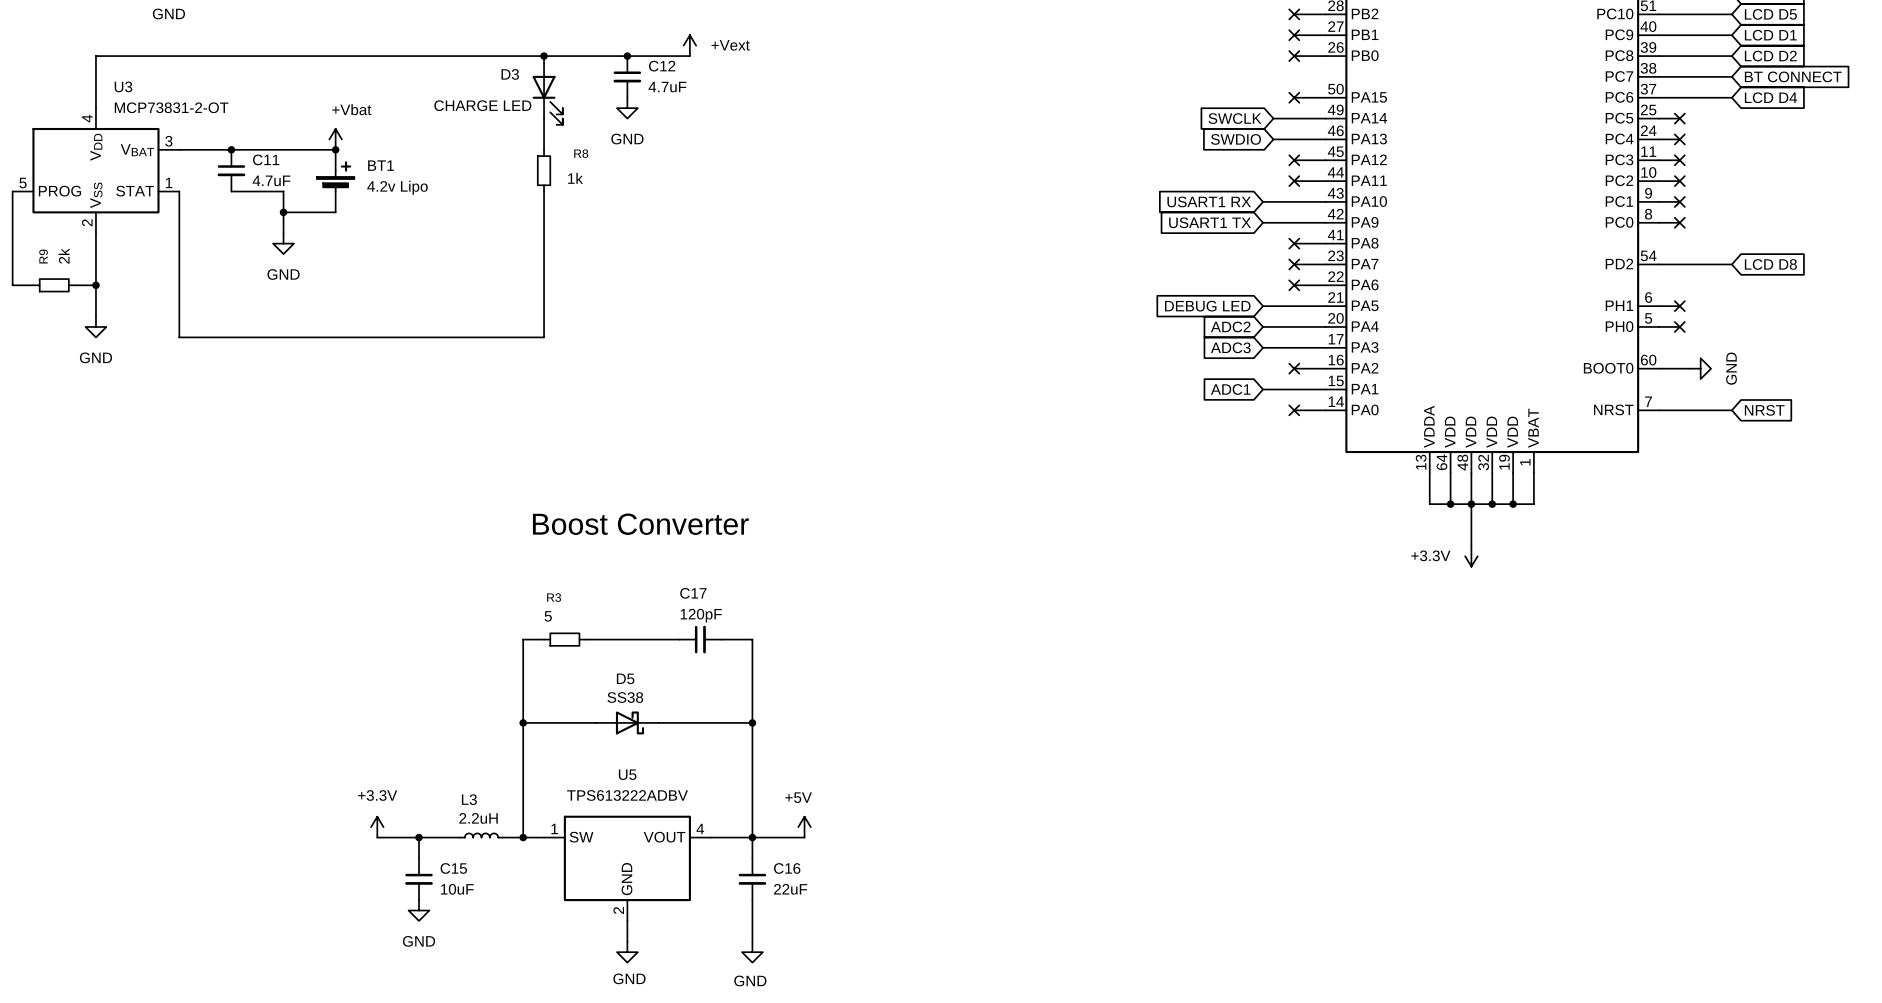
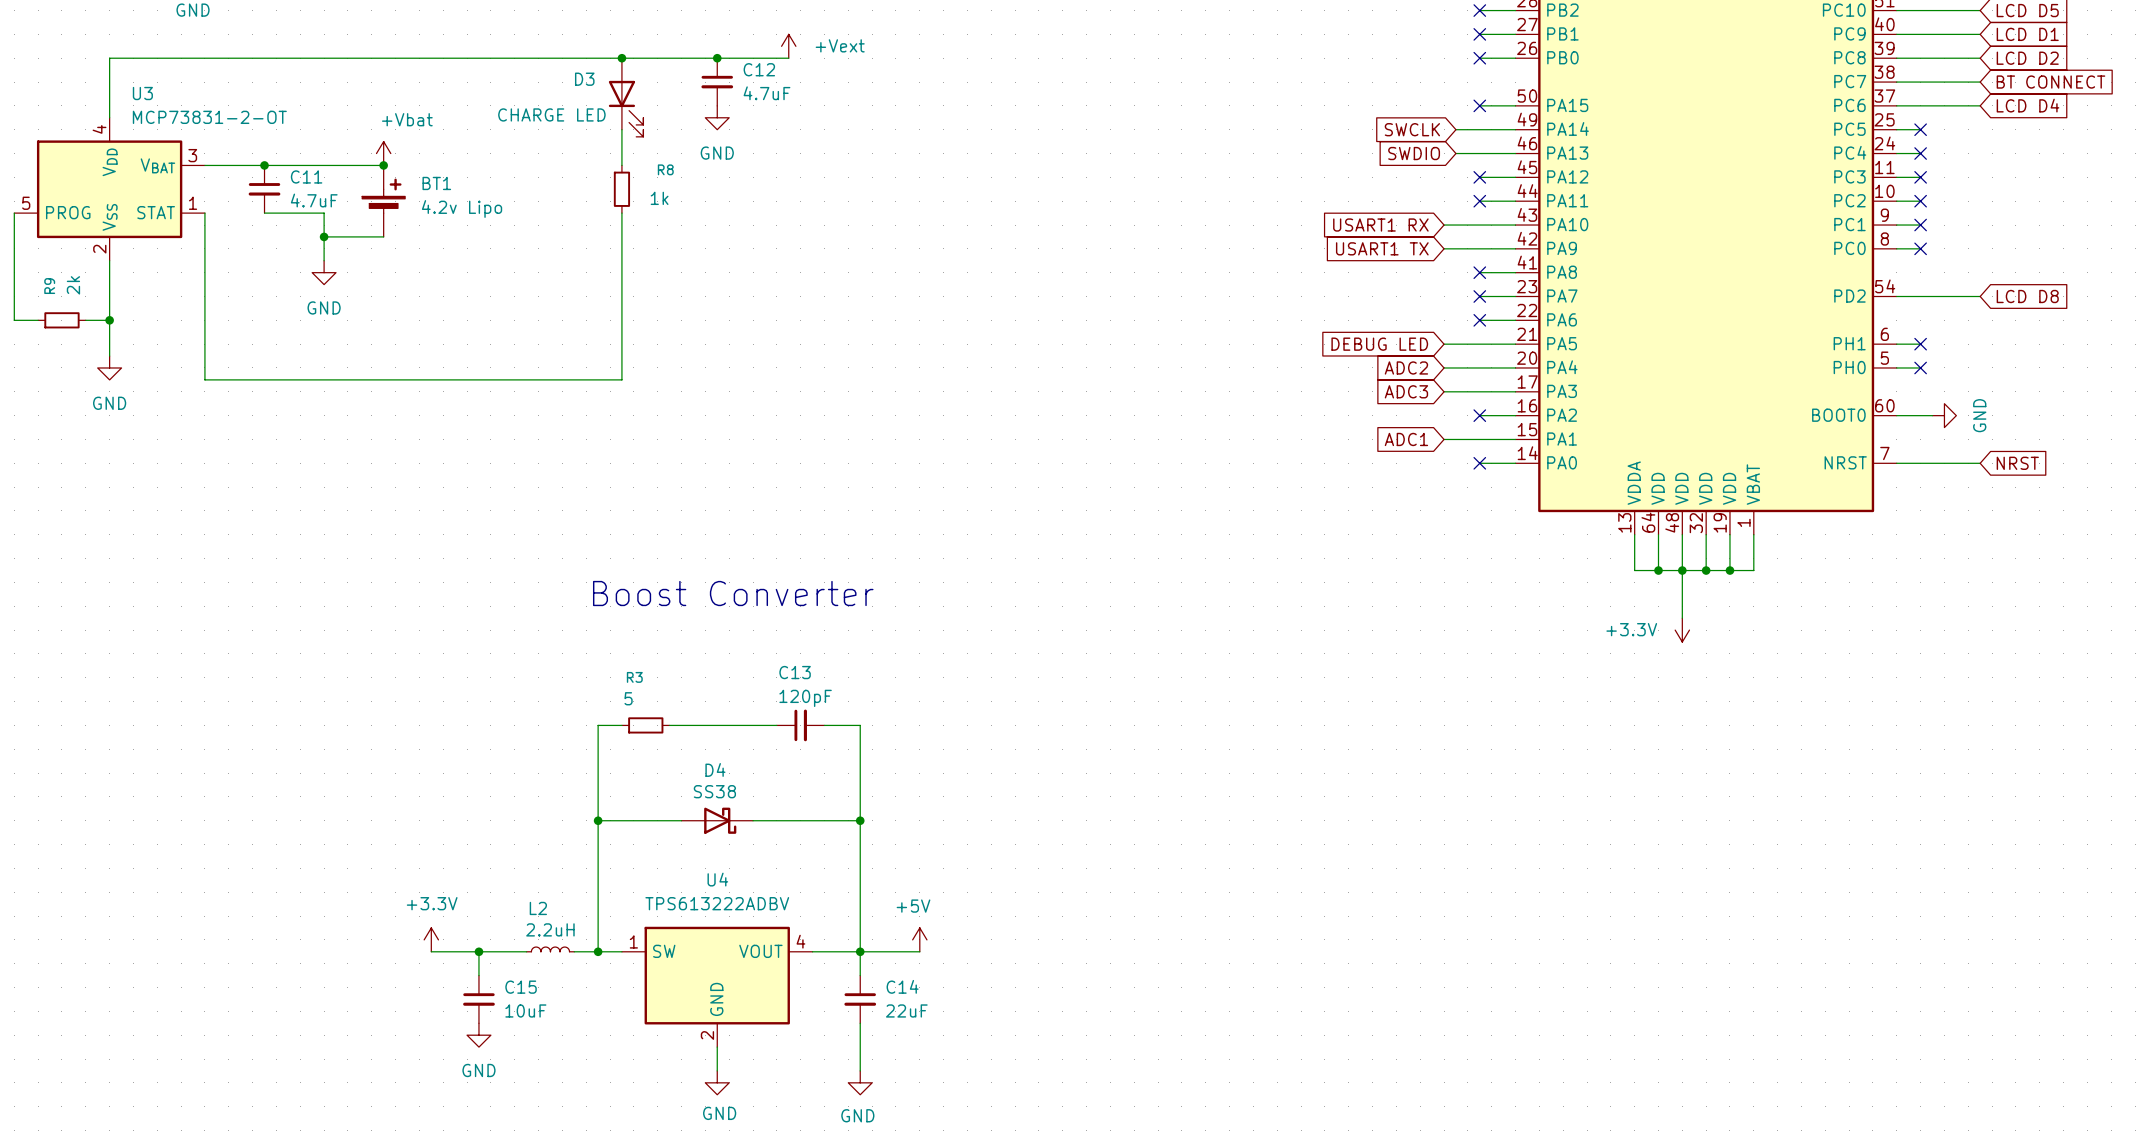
C17 name: C17 (693, 593) -> C13 (795, 672)
D5 name: D5 (625, 678) -> D4 (715, 769)
U5 name: U5 (627, 774) -> U4 (717, 879)
L3 name: L3 (469, 799) -> L2 (538, 908)
C16 name: C16 (787, 868) -> C14 (902, 986)

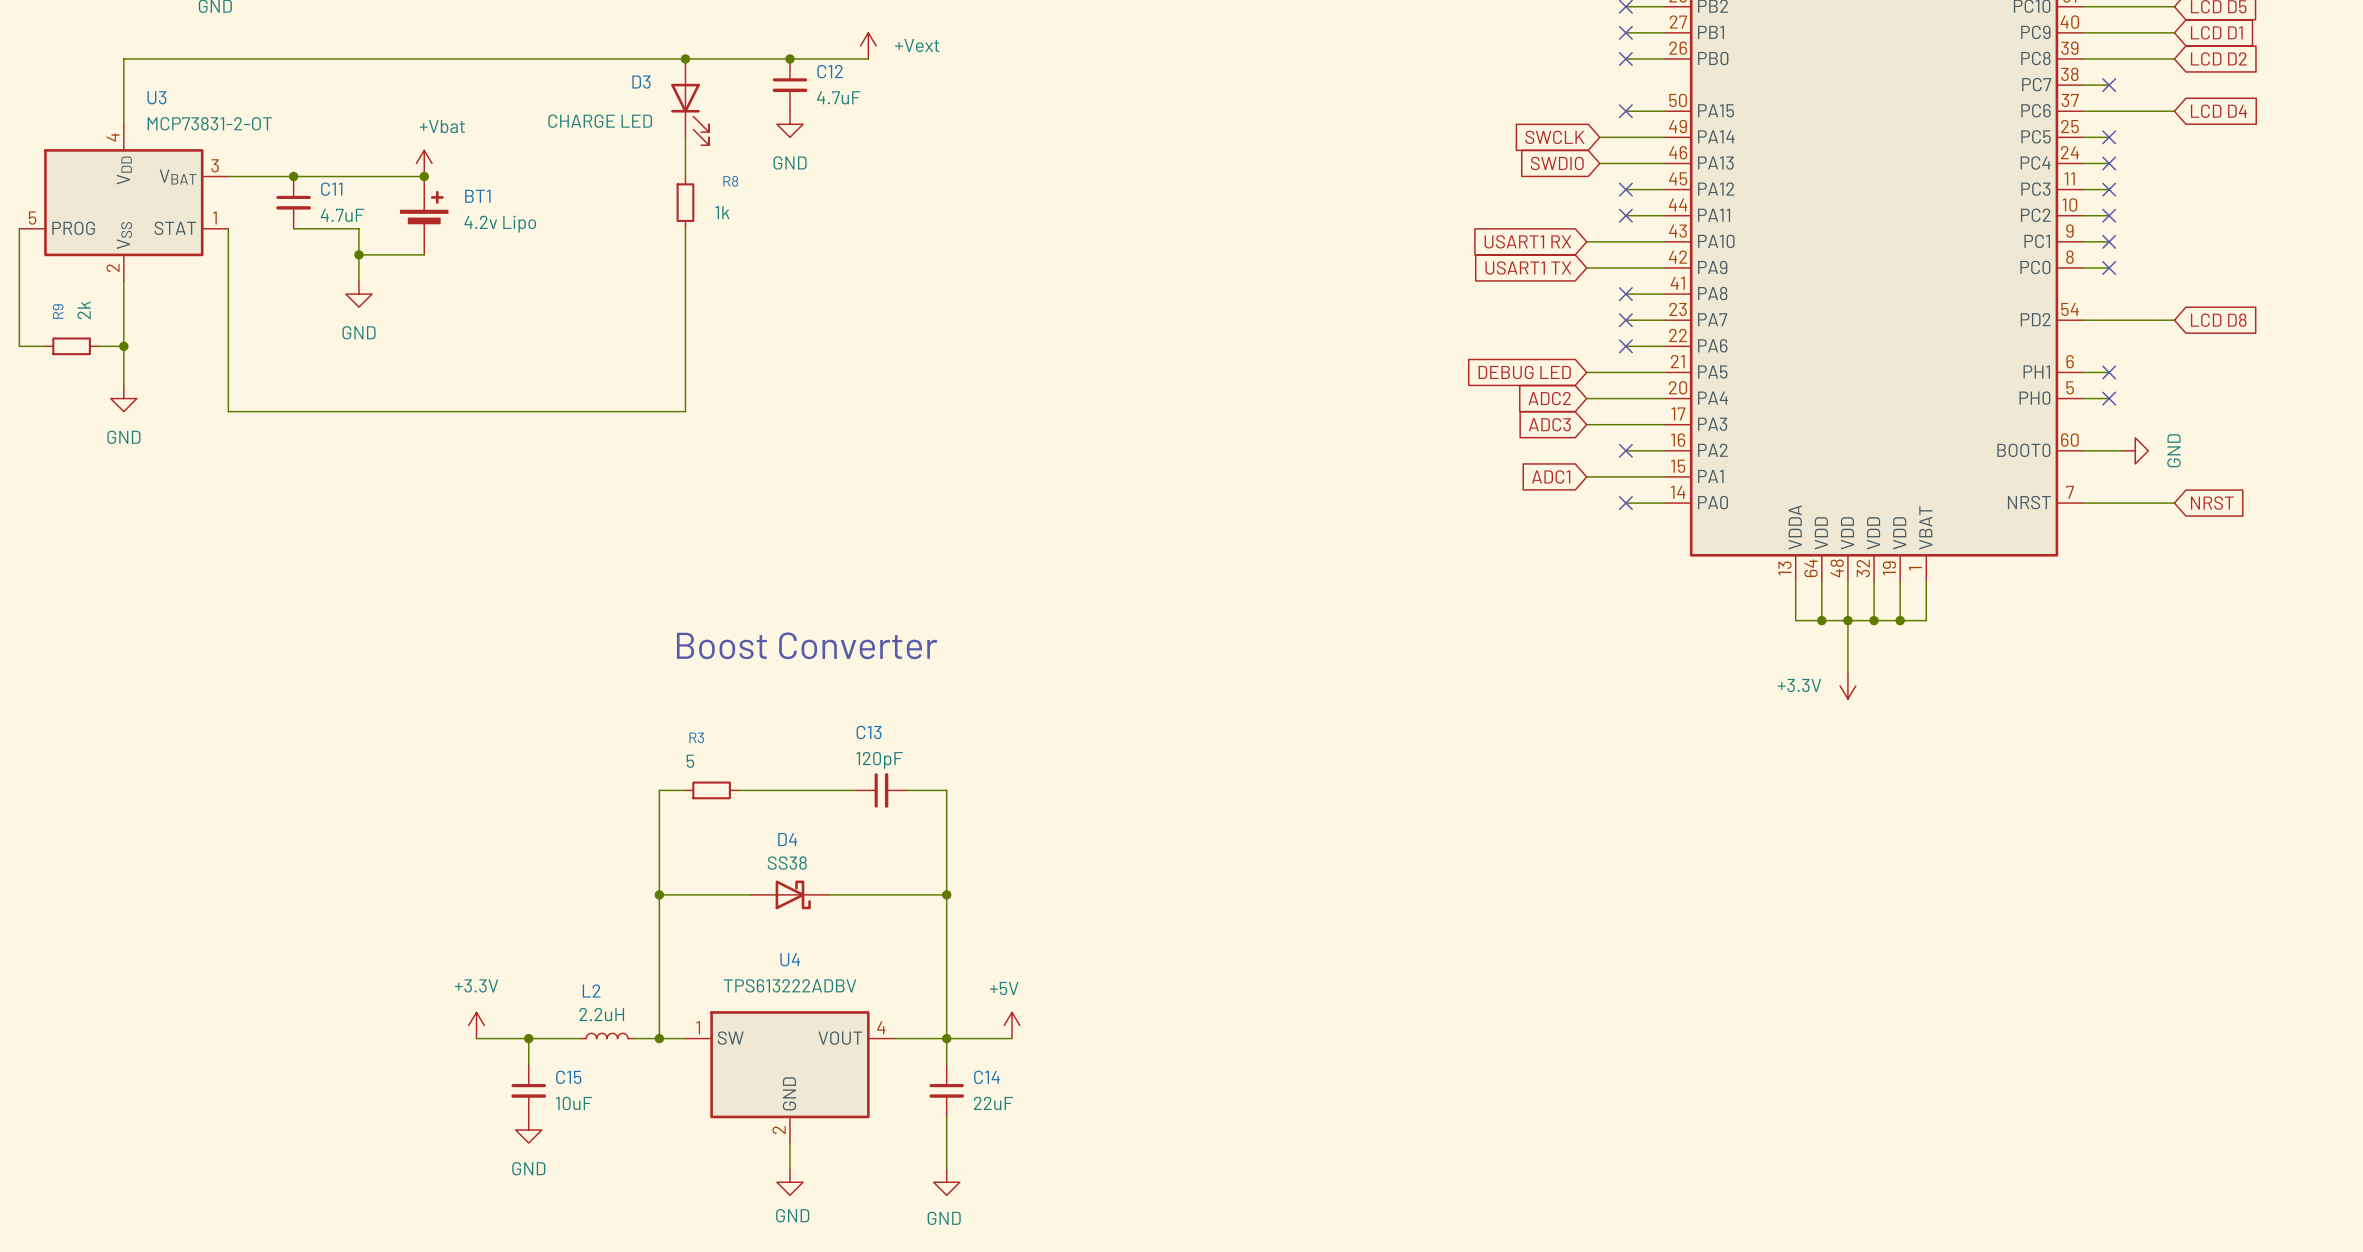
wire: (1920, 82) (1980, 82) -> none
no-connect mark: none -> (2109, 85)
global label: BT CONNECT (2050, 82) -> none

